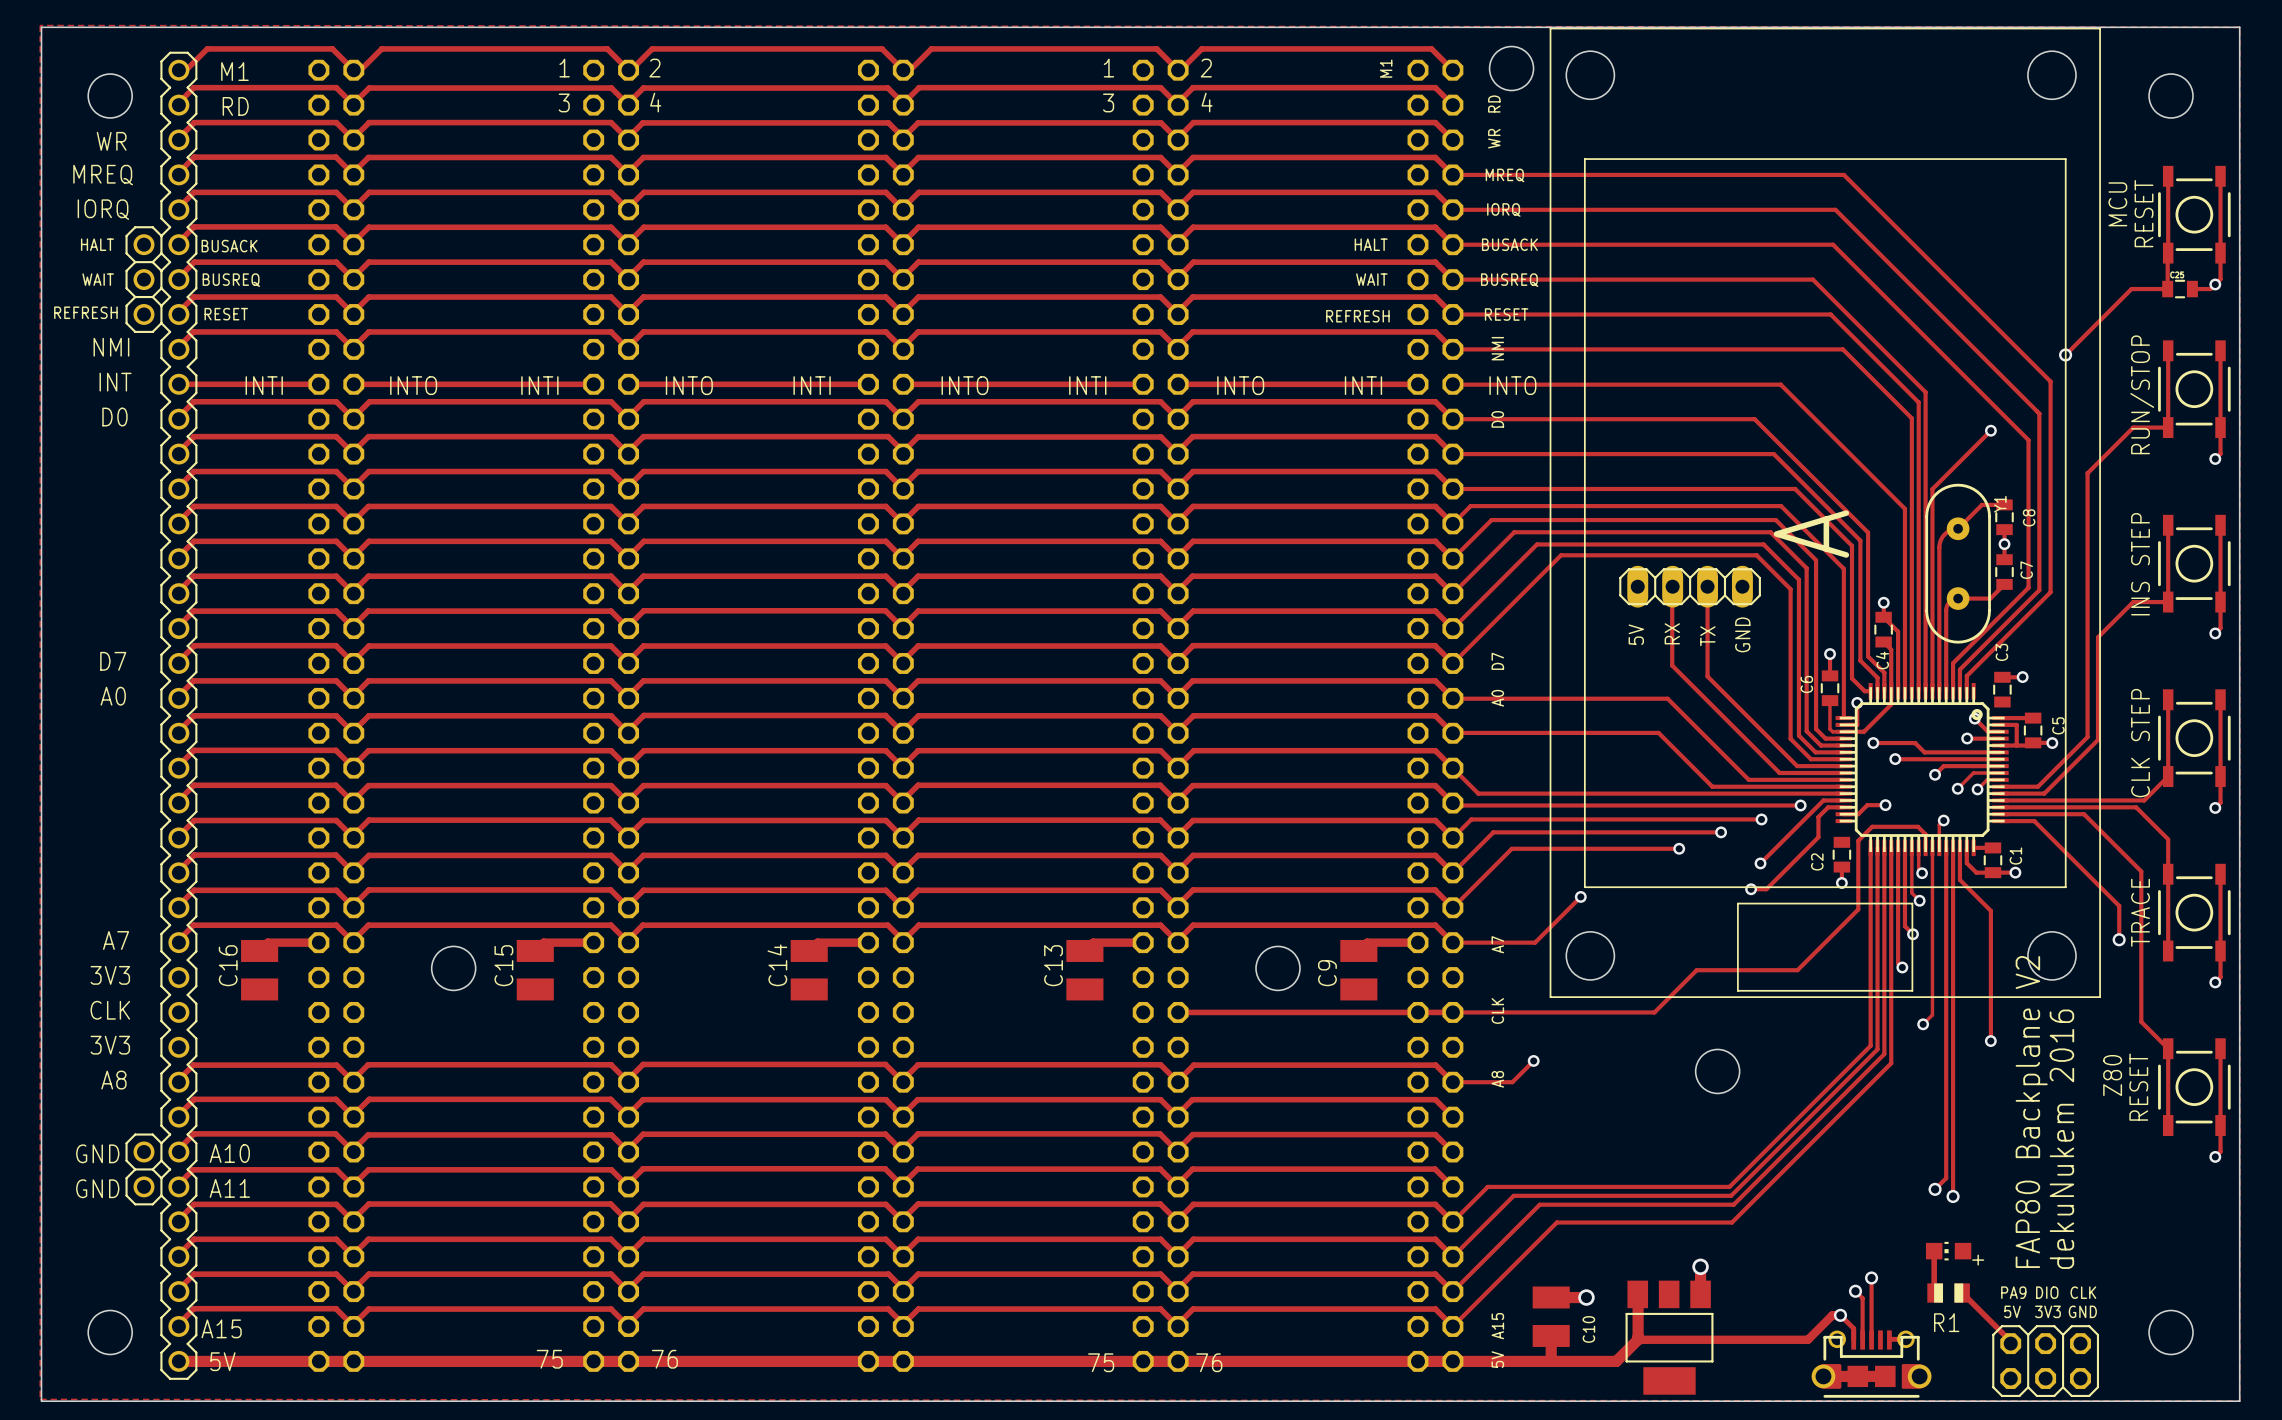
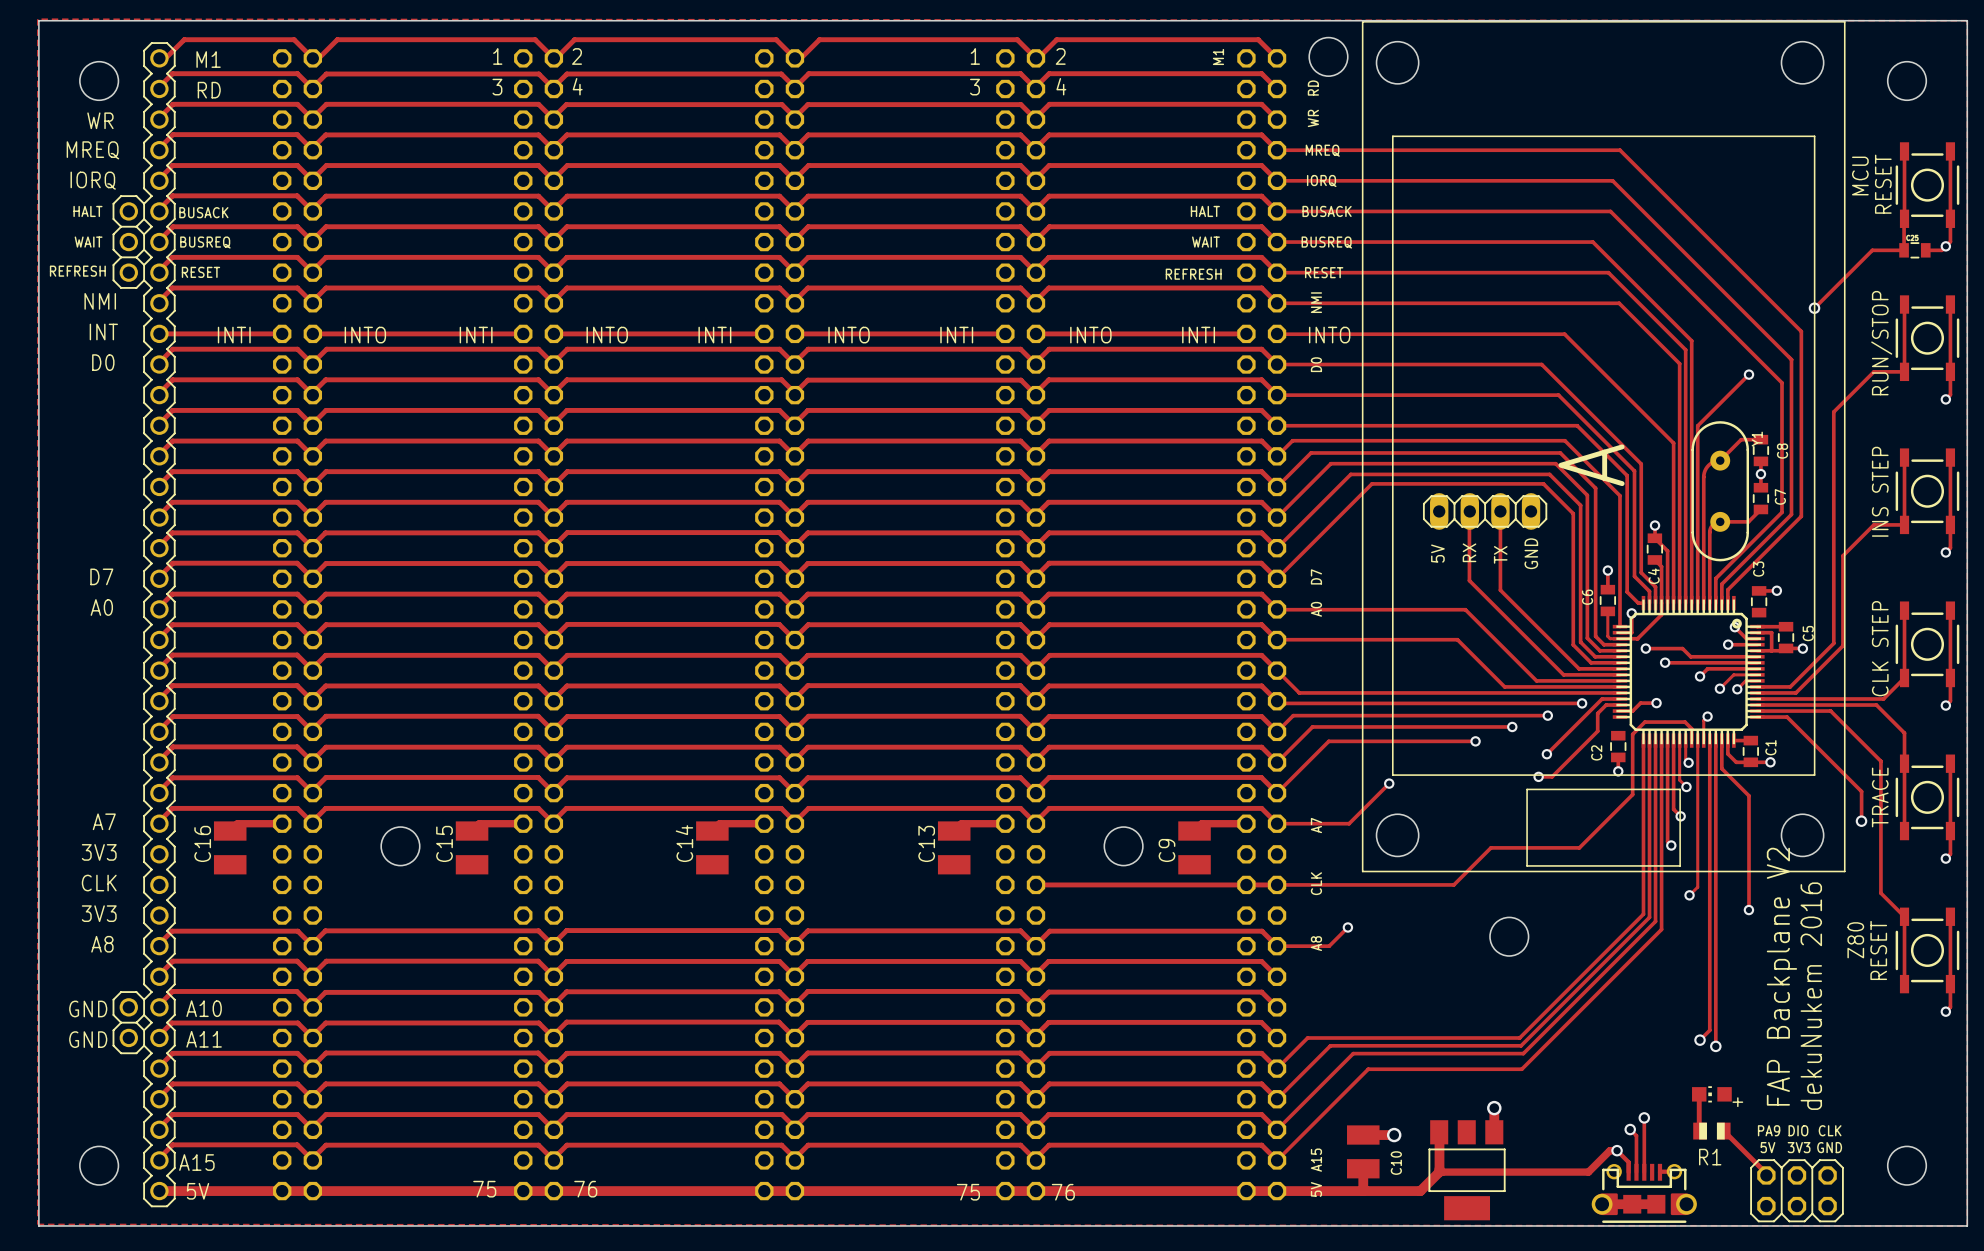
text: FAP80 Backplane V2 (2031, 1112) -> FAP Backplane V2 (1781, 976)

